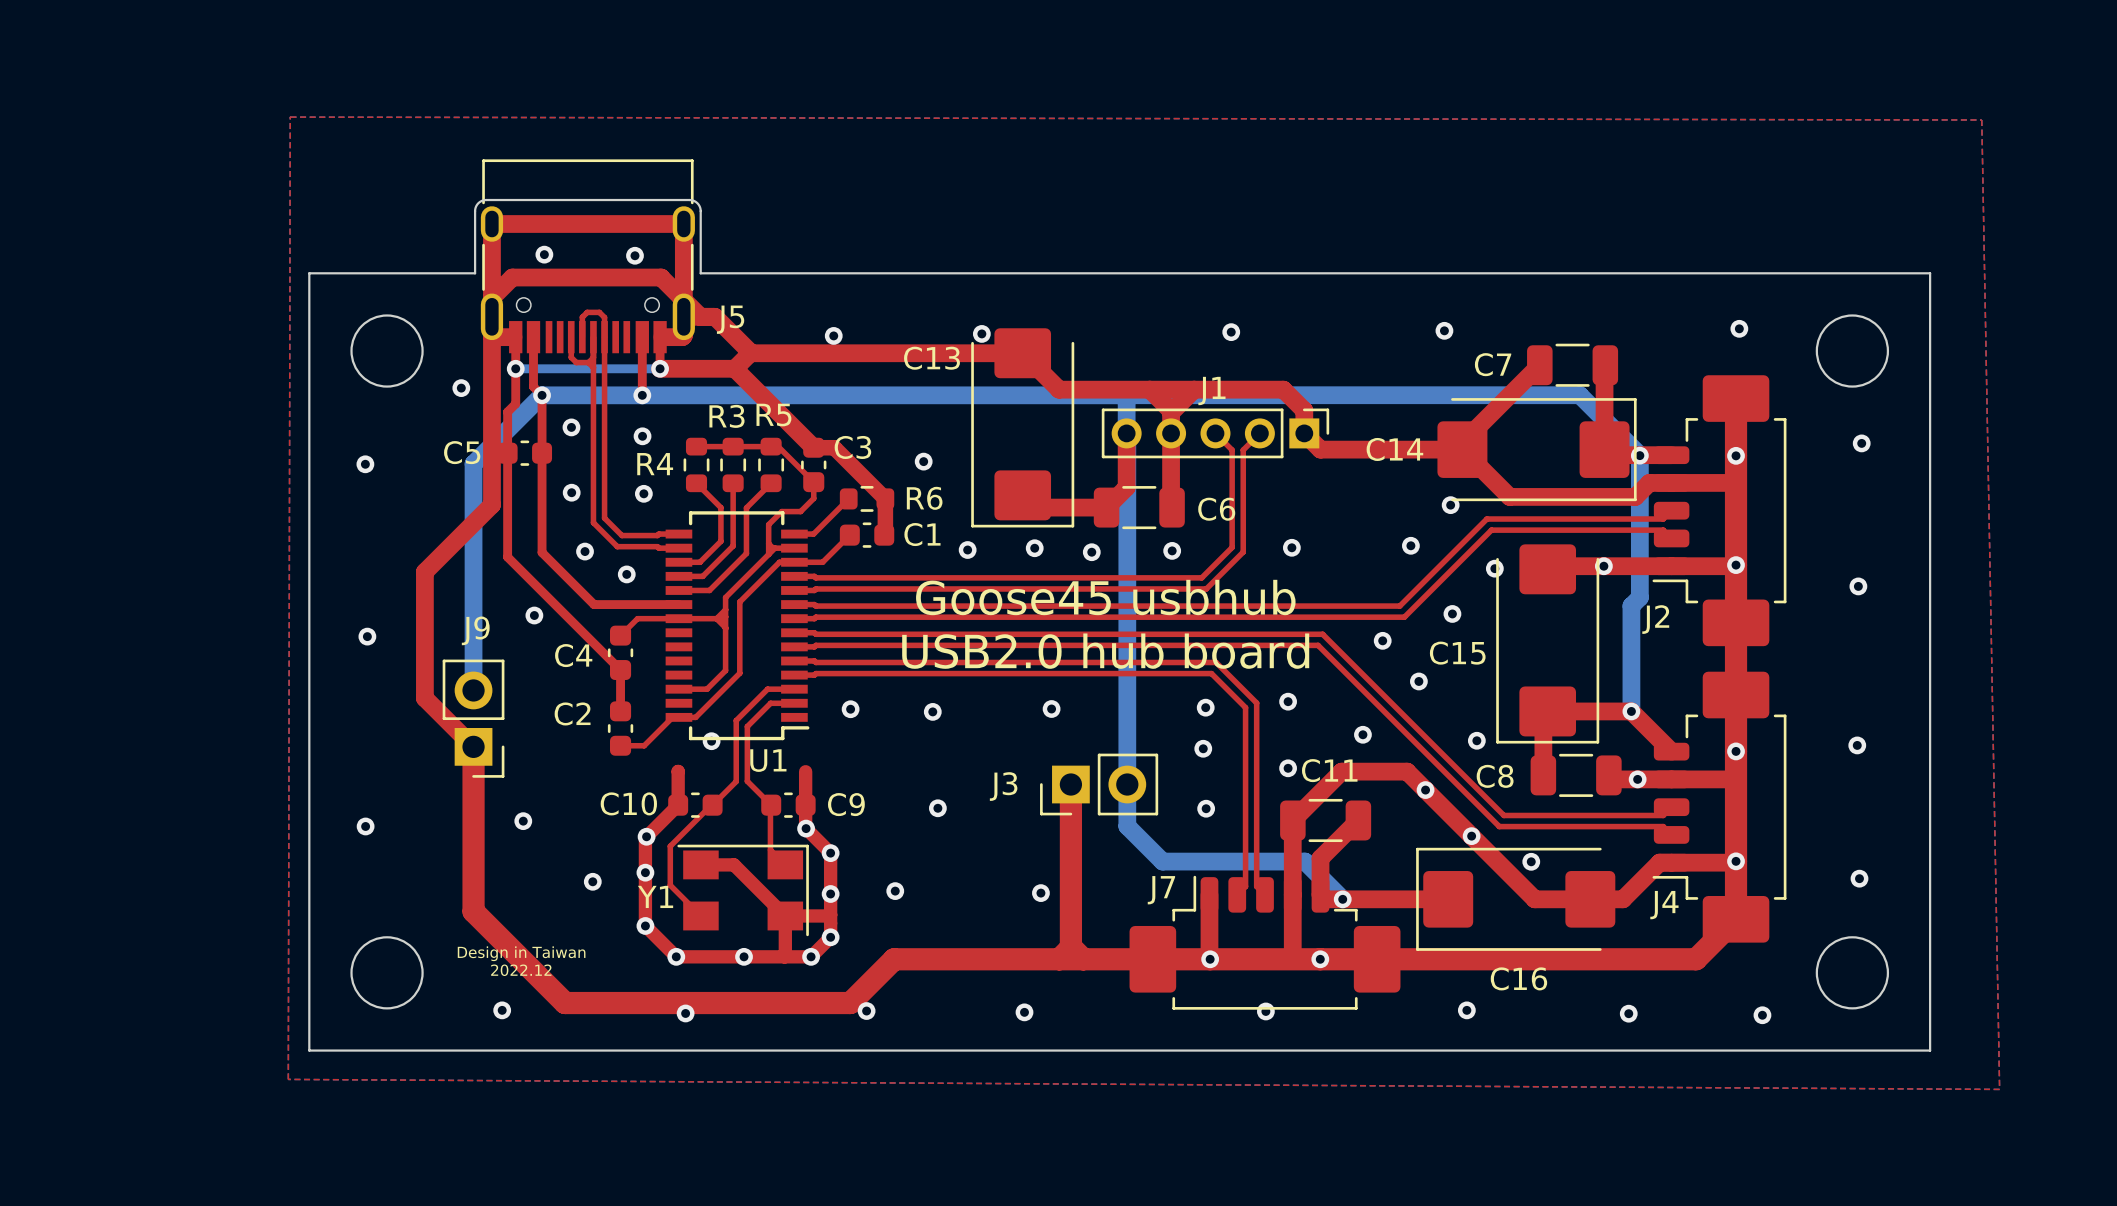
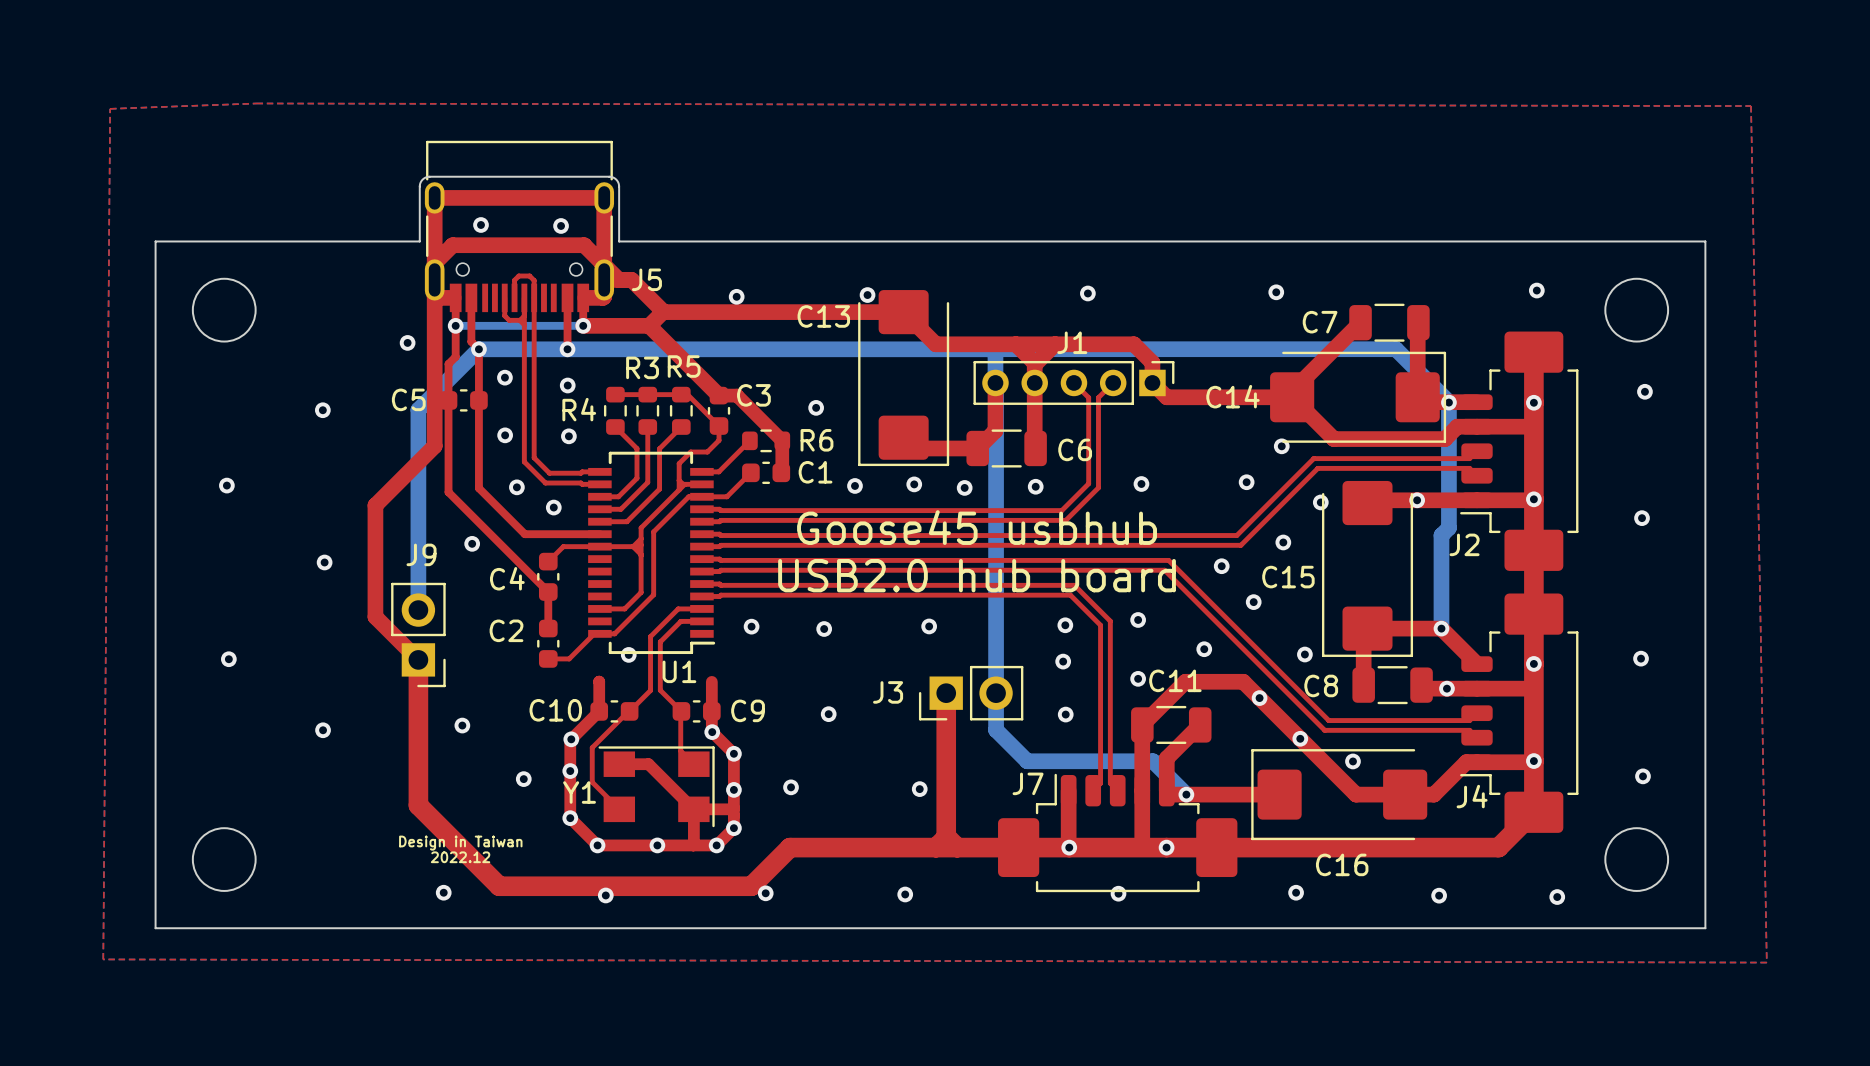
top zone outline: (290, 116) (288, 1079) (1999, 1089) -> (256, 103) (110, 108) (103, 959) (1766, 962)
board edge: (309, 273) (309, 1050) -> (273, 241) (155, 241) (155, 928) (273, 928)
round board edge position: (387, 351) -> (224, 310)
via: none -> (226, 485)
via: none -> (228, 659)
round board edge position: (387, 972) -> (224, 859)

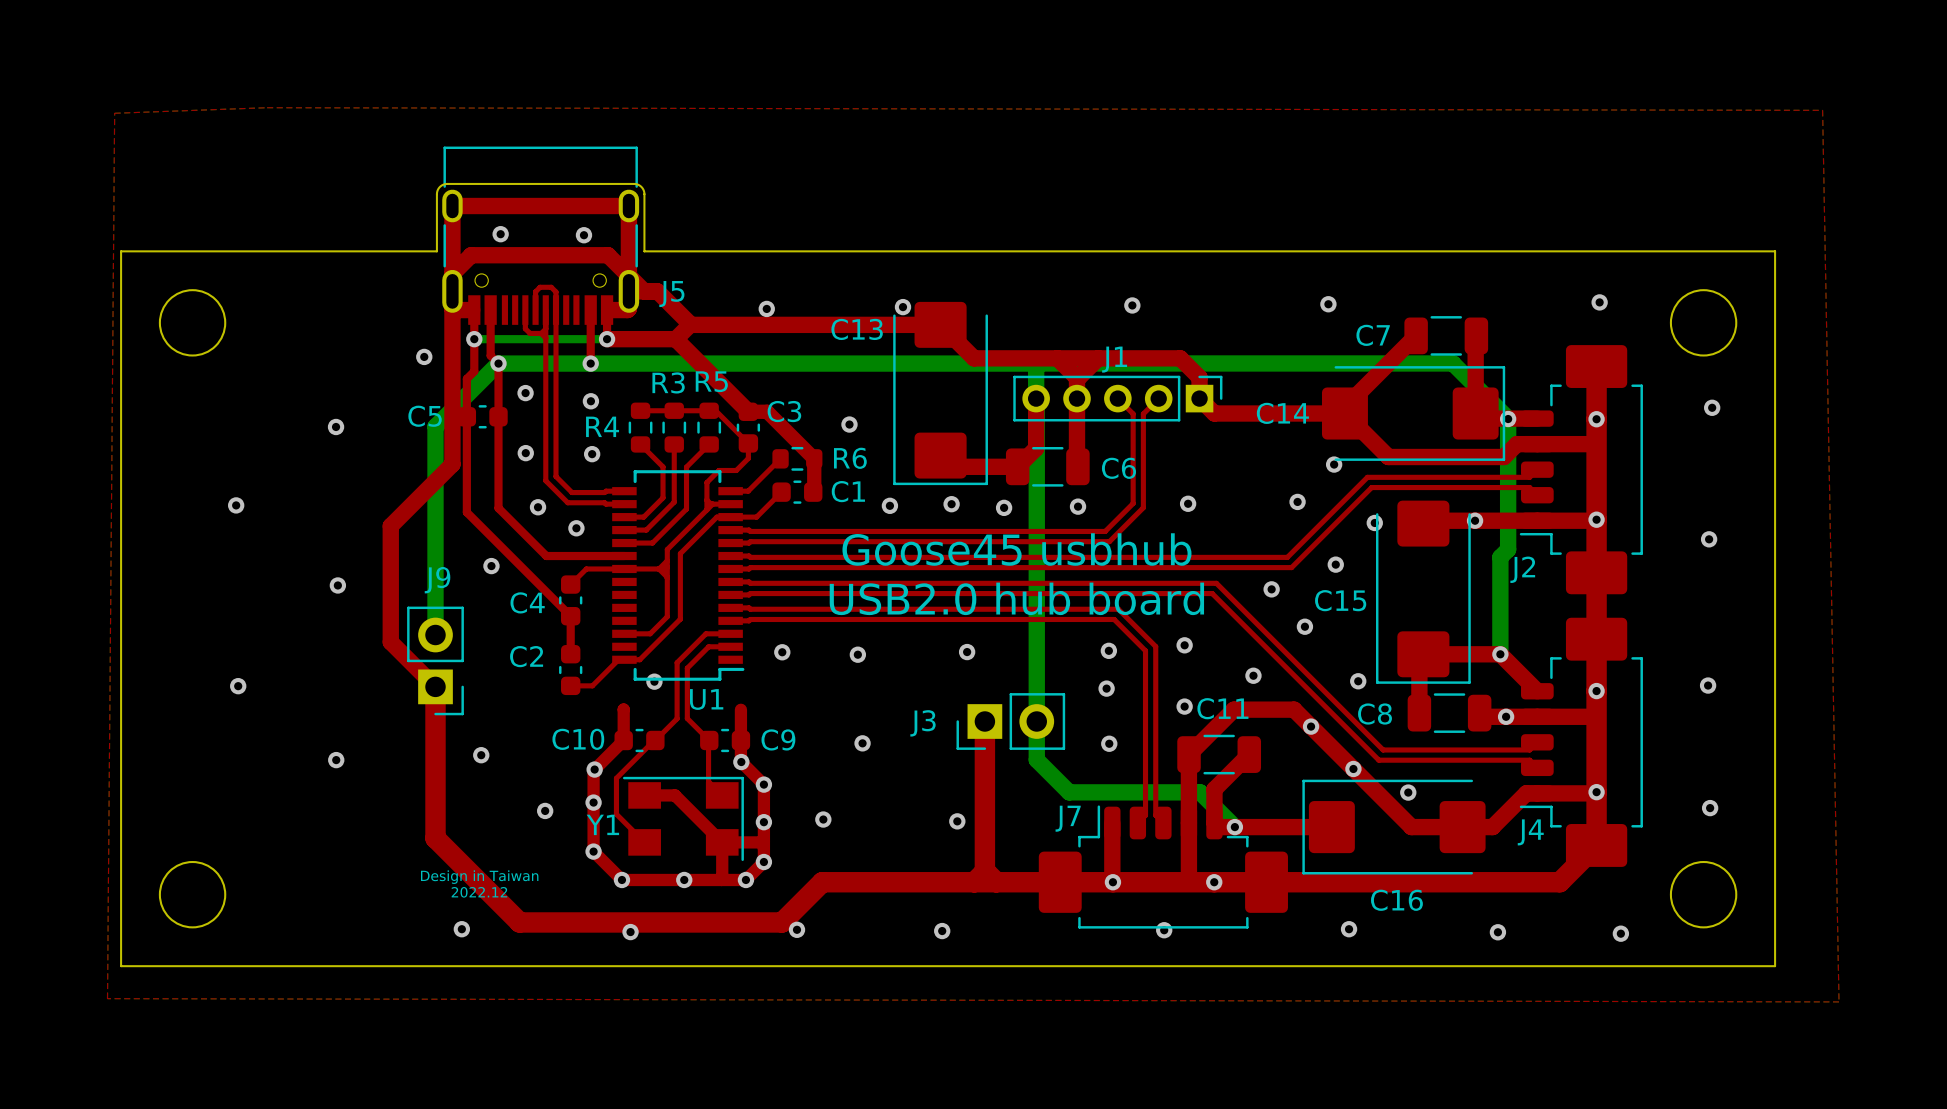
board edge: (155, 241) (155, 928) -> (161, 251) (121, 251) (121, 966) (161, 966)
round board edge position: (224, 310) -> (192, 322)
round board edge position: (224, 859) -> (192, 894)

